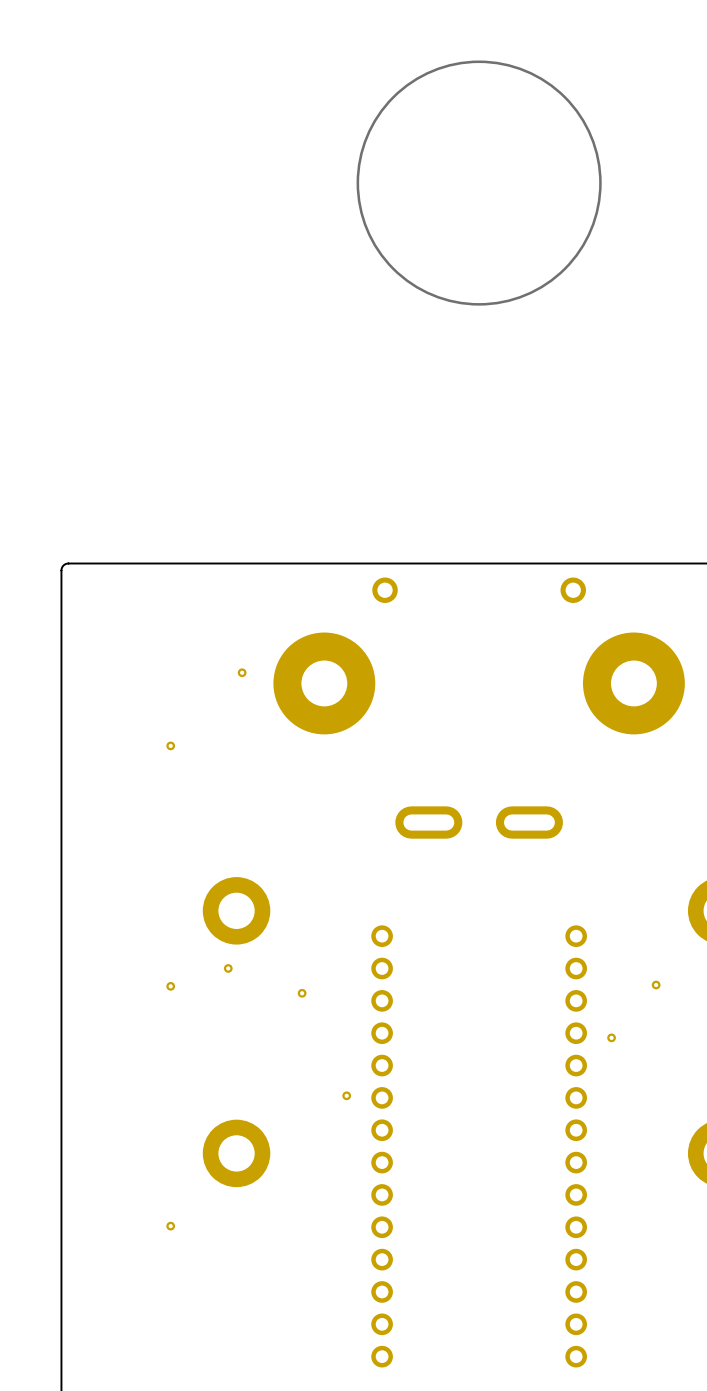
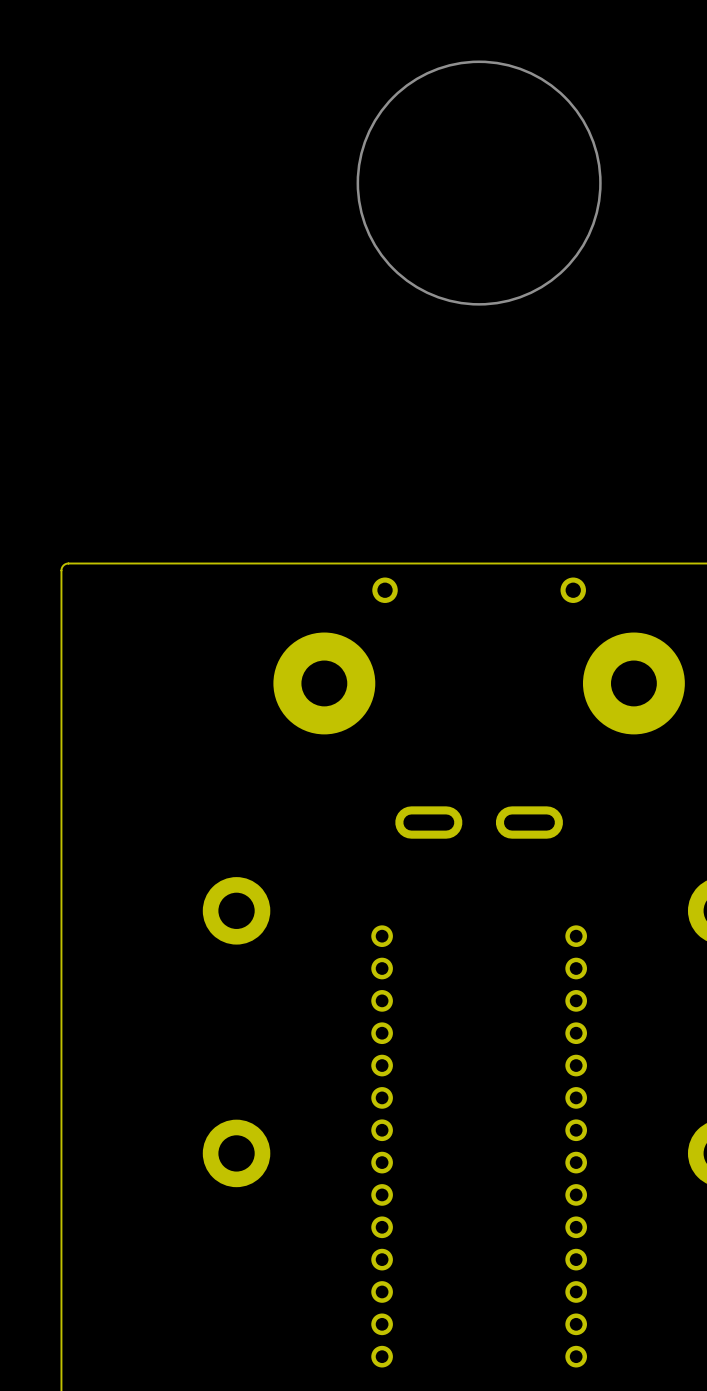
part: (242, 672) -> none
part: (170, 745) -> none
part: (228, 968) -> none
part: (656, 985) -> none
part: (170, 986) -> none
part: (302, 993) -> none
part: (611, 1037) -> none
part: (346, 1095) -> none
part: (170, 1226) -> none

